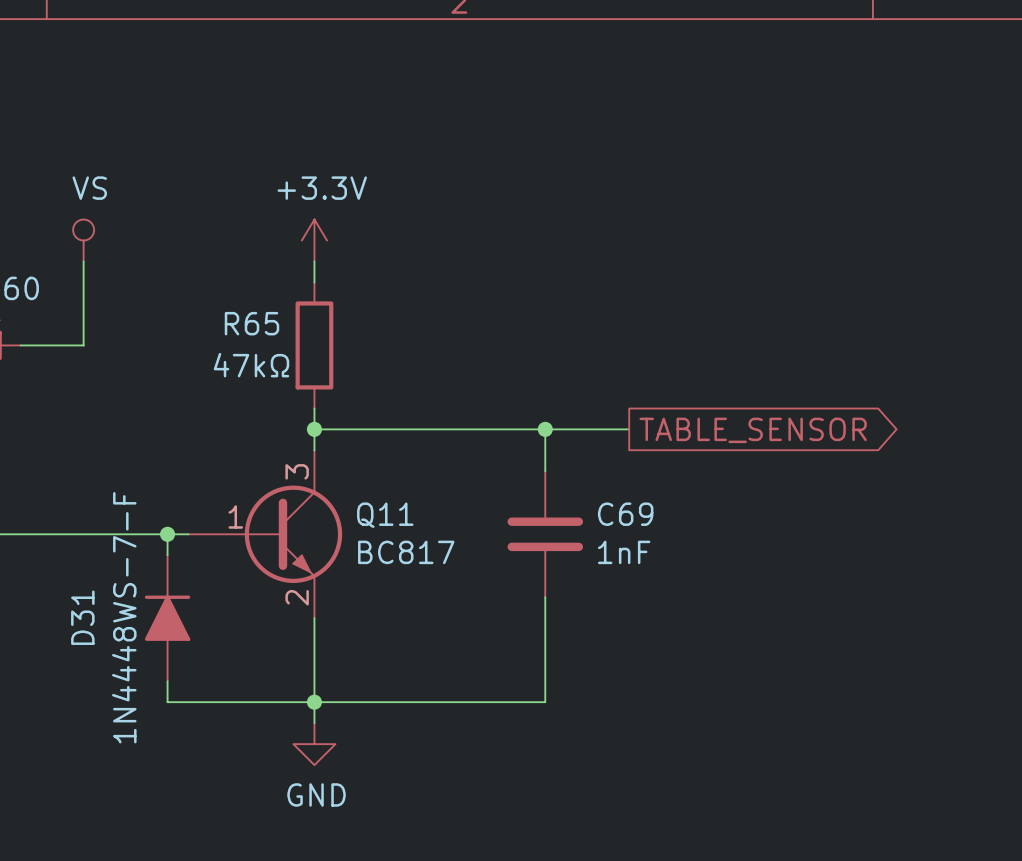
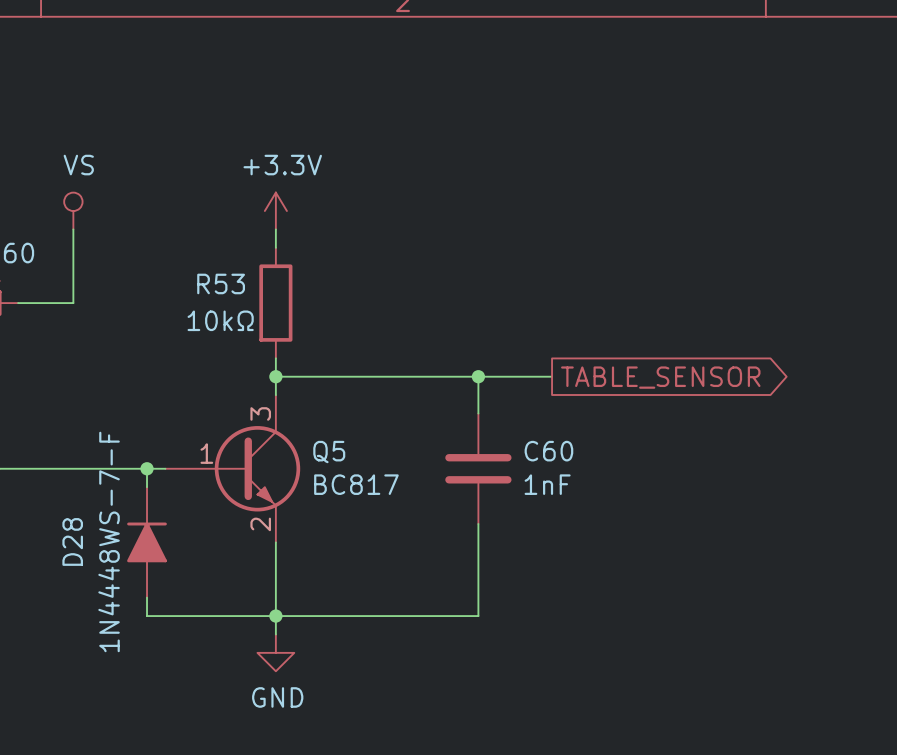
R65 name: R65 (251, 323) -> R53 (221, 283)
R65 value: 47kΩ (251, 365) -> 10kΩ (220, 320)
C69 name: C69 (625, 514) -> C60 (548, 451)
Q11 name: Q11 (385, 515) -> Q5 (329, 452)
D31 name: D31 (82, 617) -> D28 (72, 541)

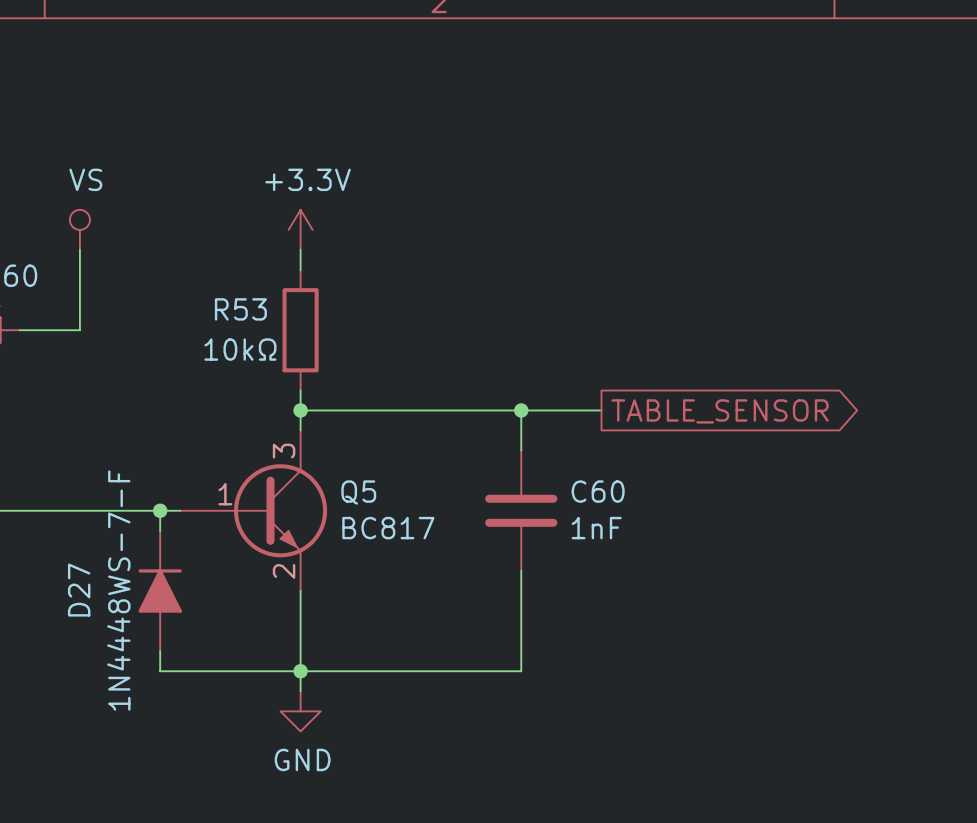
D28 name: D28 (72, 541) -> D27 (79, 590)

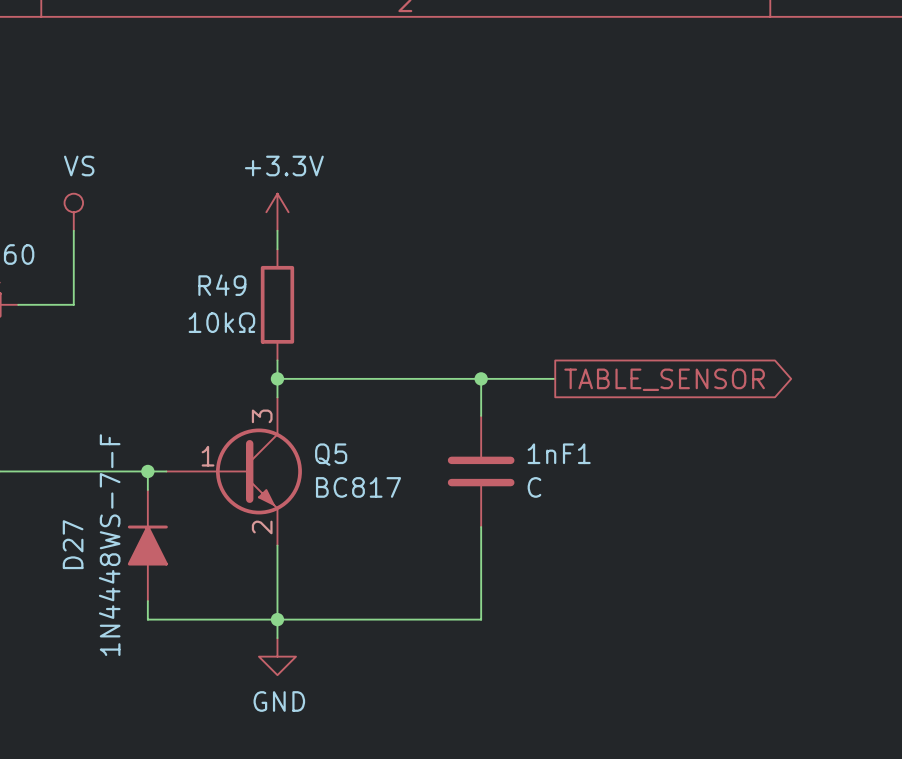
R53 name: R53 (240, 309) -> R49 (222, 285)
C60 name: C60 (598, 491) -> 1nF1 (559, 453)
C60 value: 1nF (596, 528) -> C (534, 487)

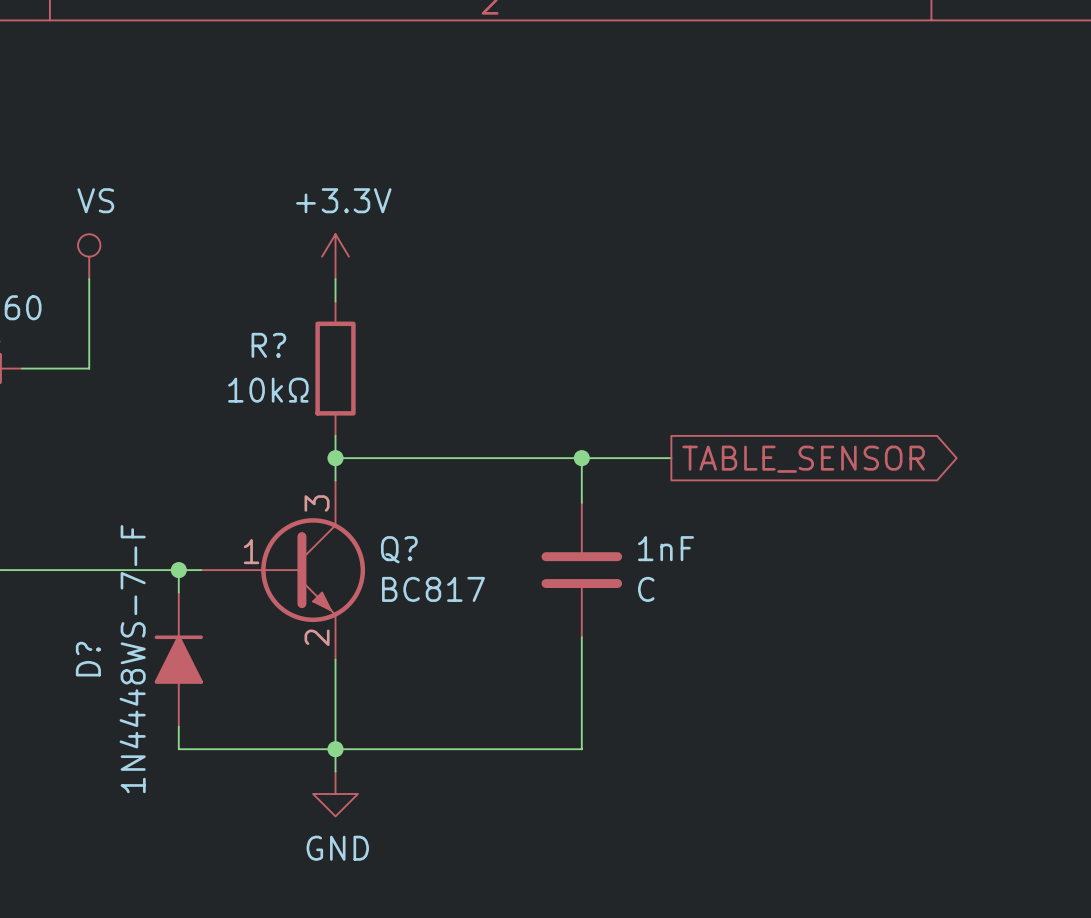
R49 name: R49 (222, 285) -> R? (268, 345)
1nF1 name: 1nF1 (559, 453) -> 1nF (665, 548)
Q5 name: Q5 (331, 454) -> Q? (399, 549)
D27 name: D27 (73, 544) -> D? (88, 659)

